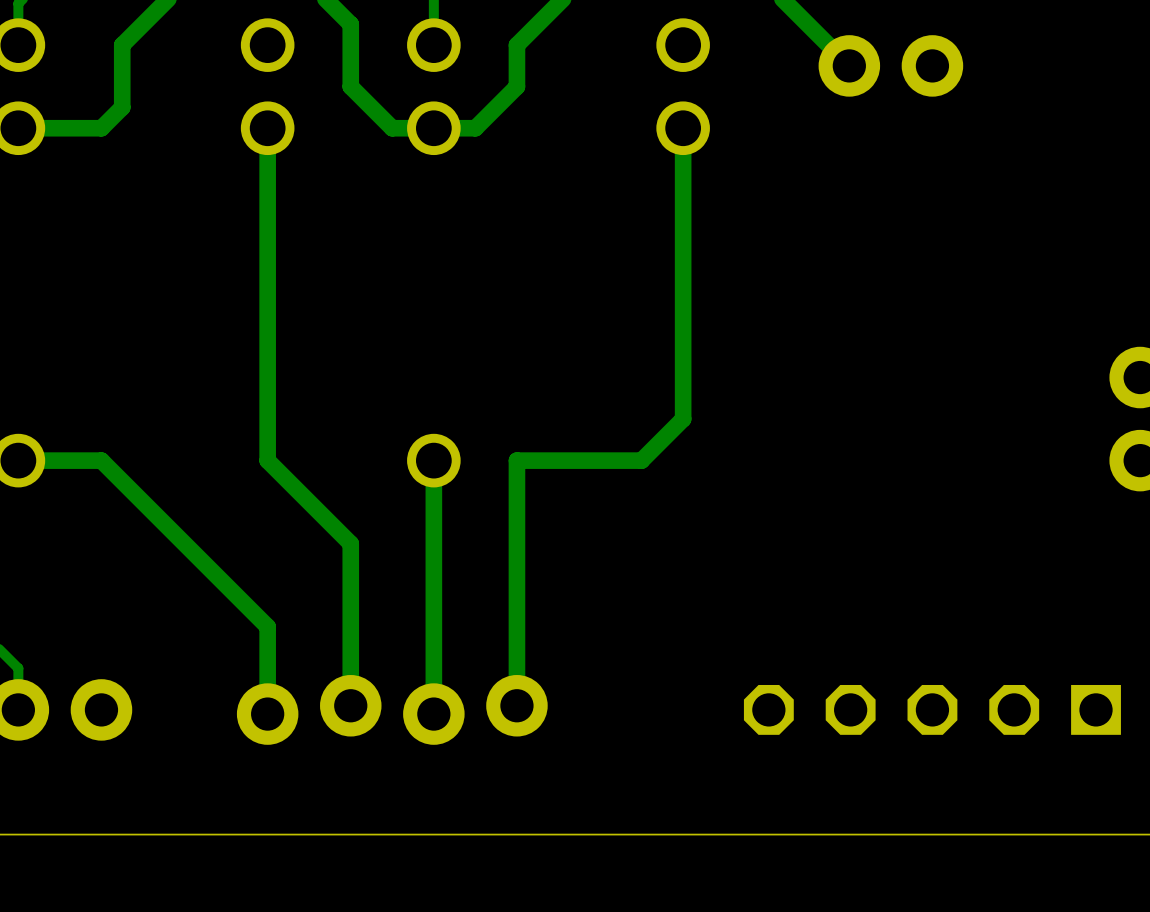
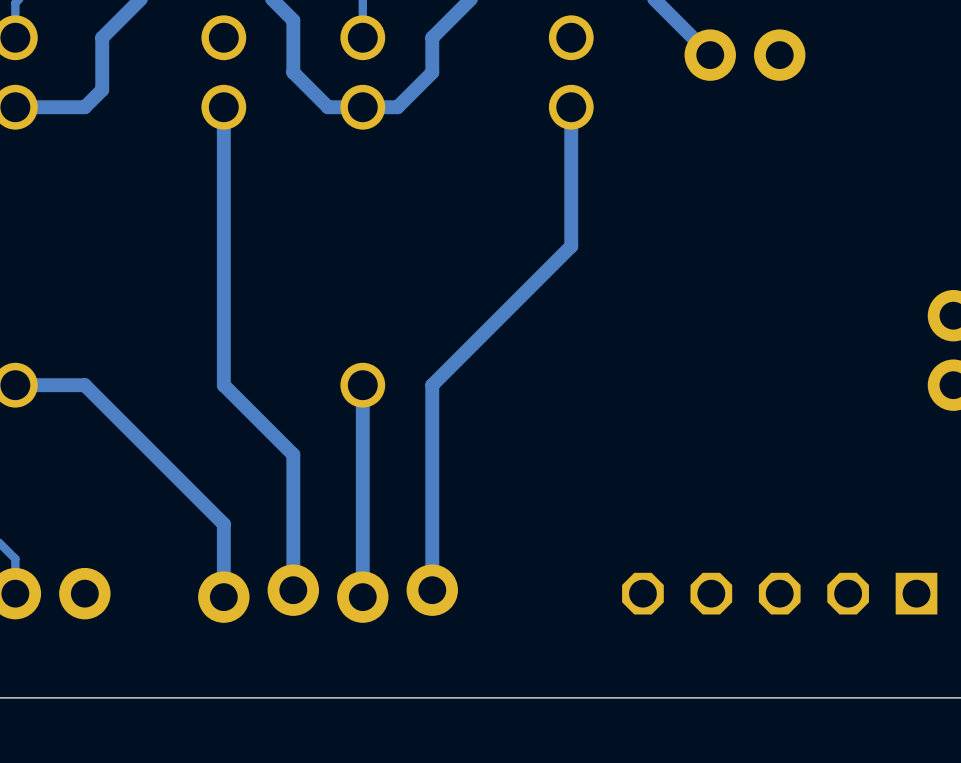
track: (683, 294) (683, 419) (641, 460) (516, 460) -> (571, 246) (432, 385)

